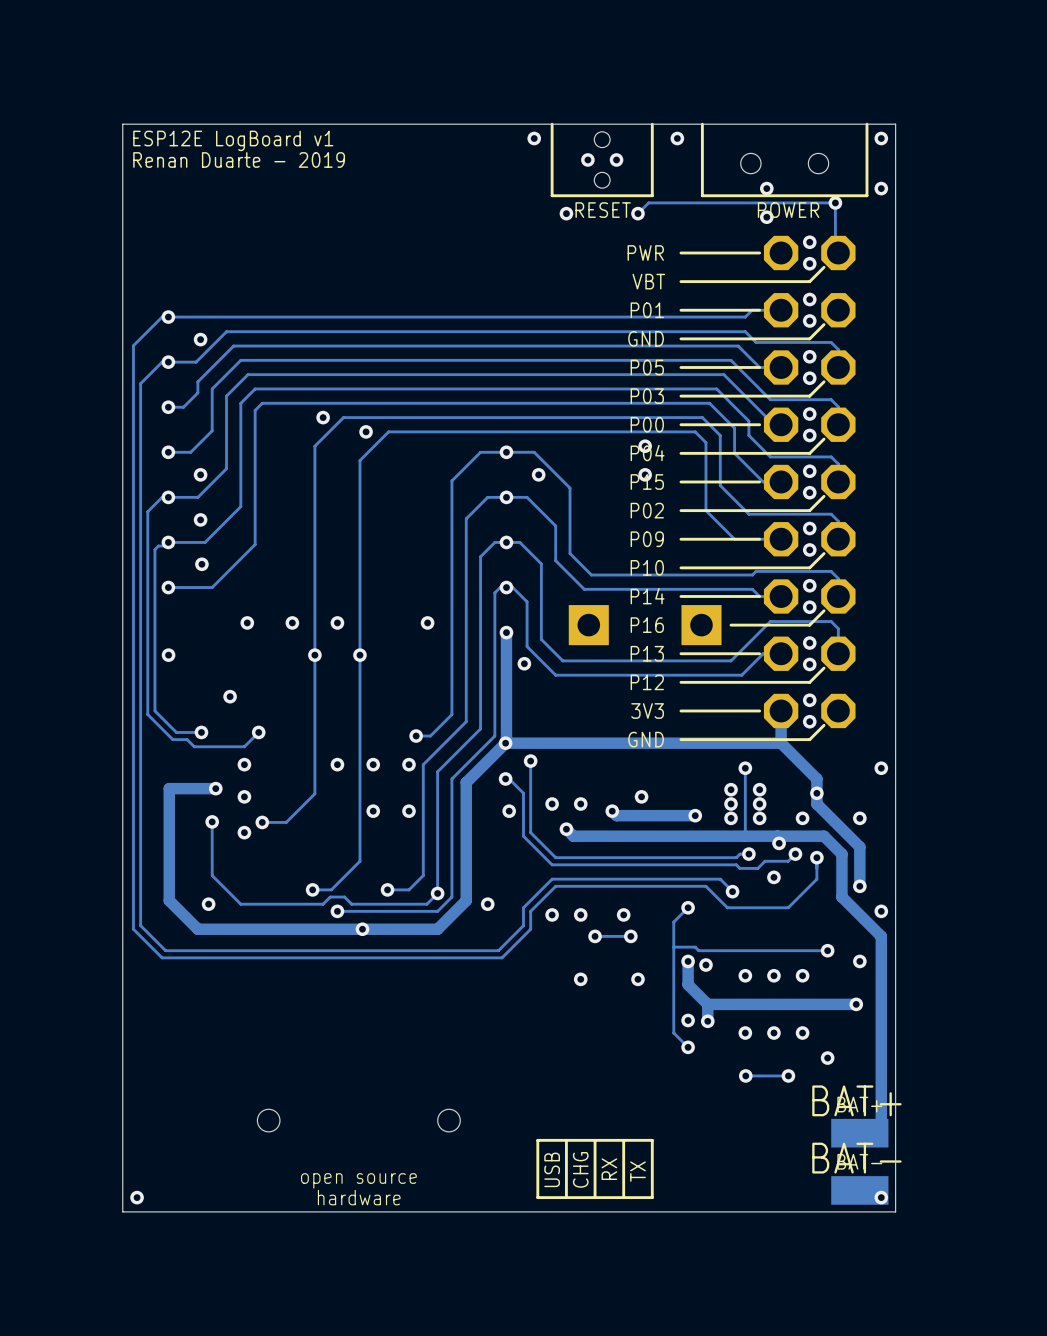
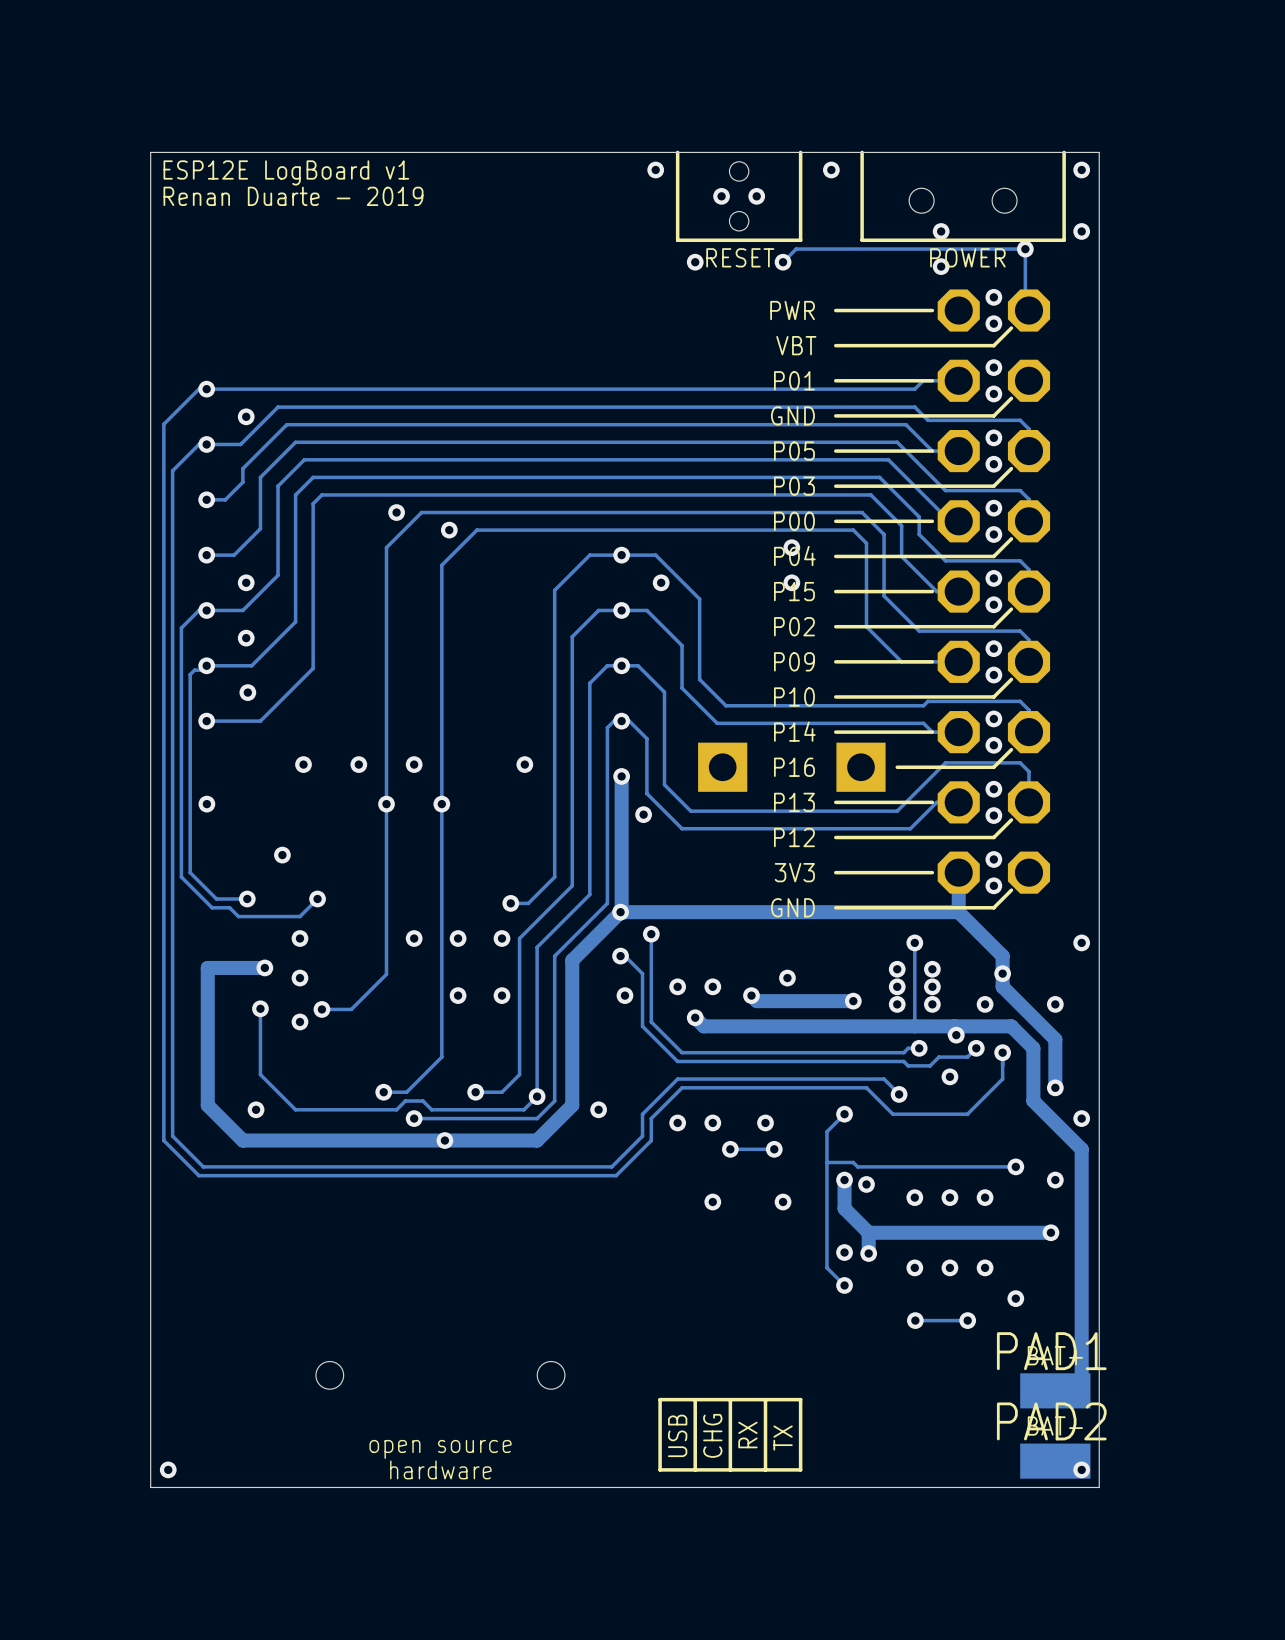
BAT+ name: BAT+ (856, 1100) -> PAD1 (1051, 1351)
BAT- name: BAT- (856, 1158) -> PAD2 (1051, 1421)

